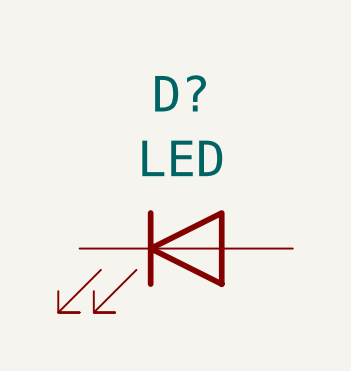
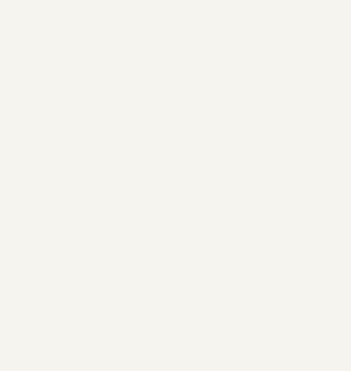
D?: LED (175, 261) -> none

